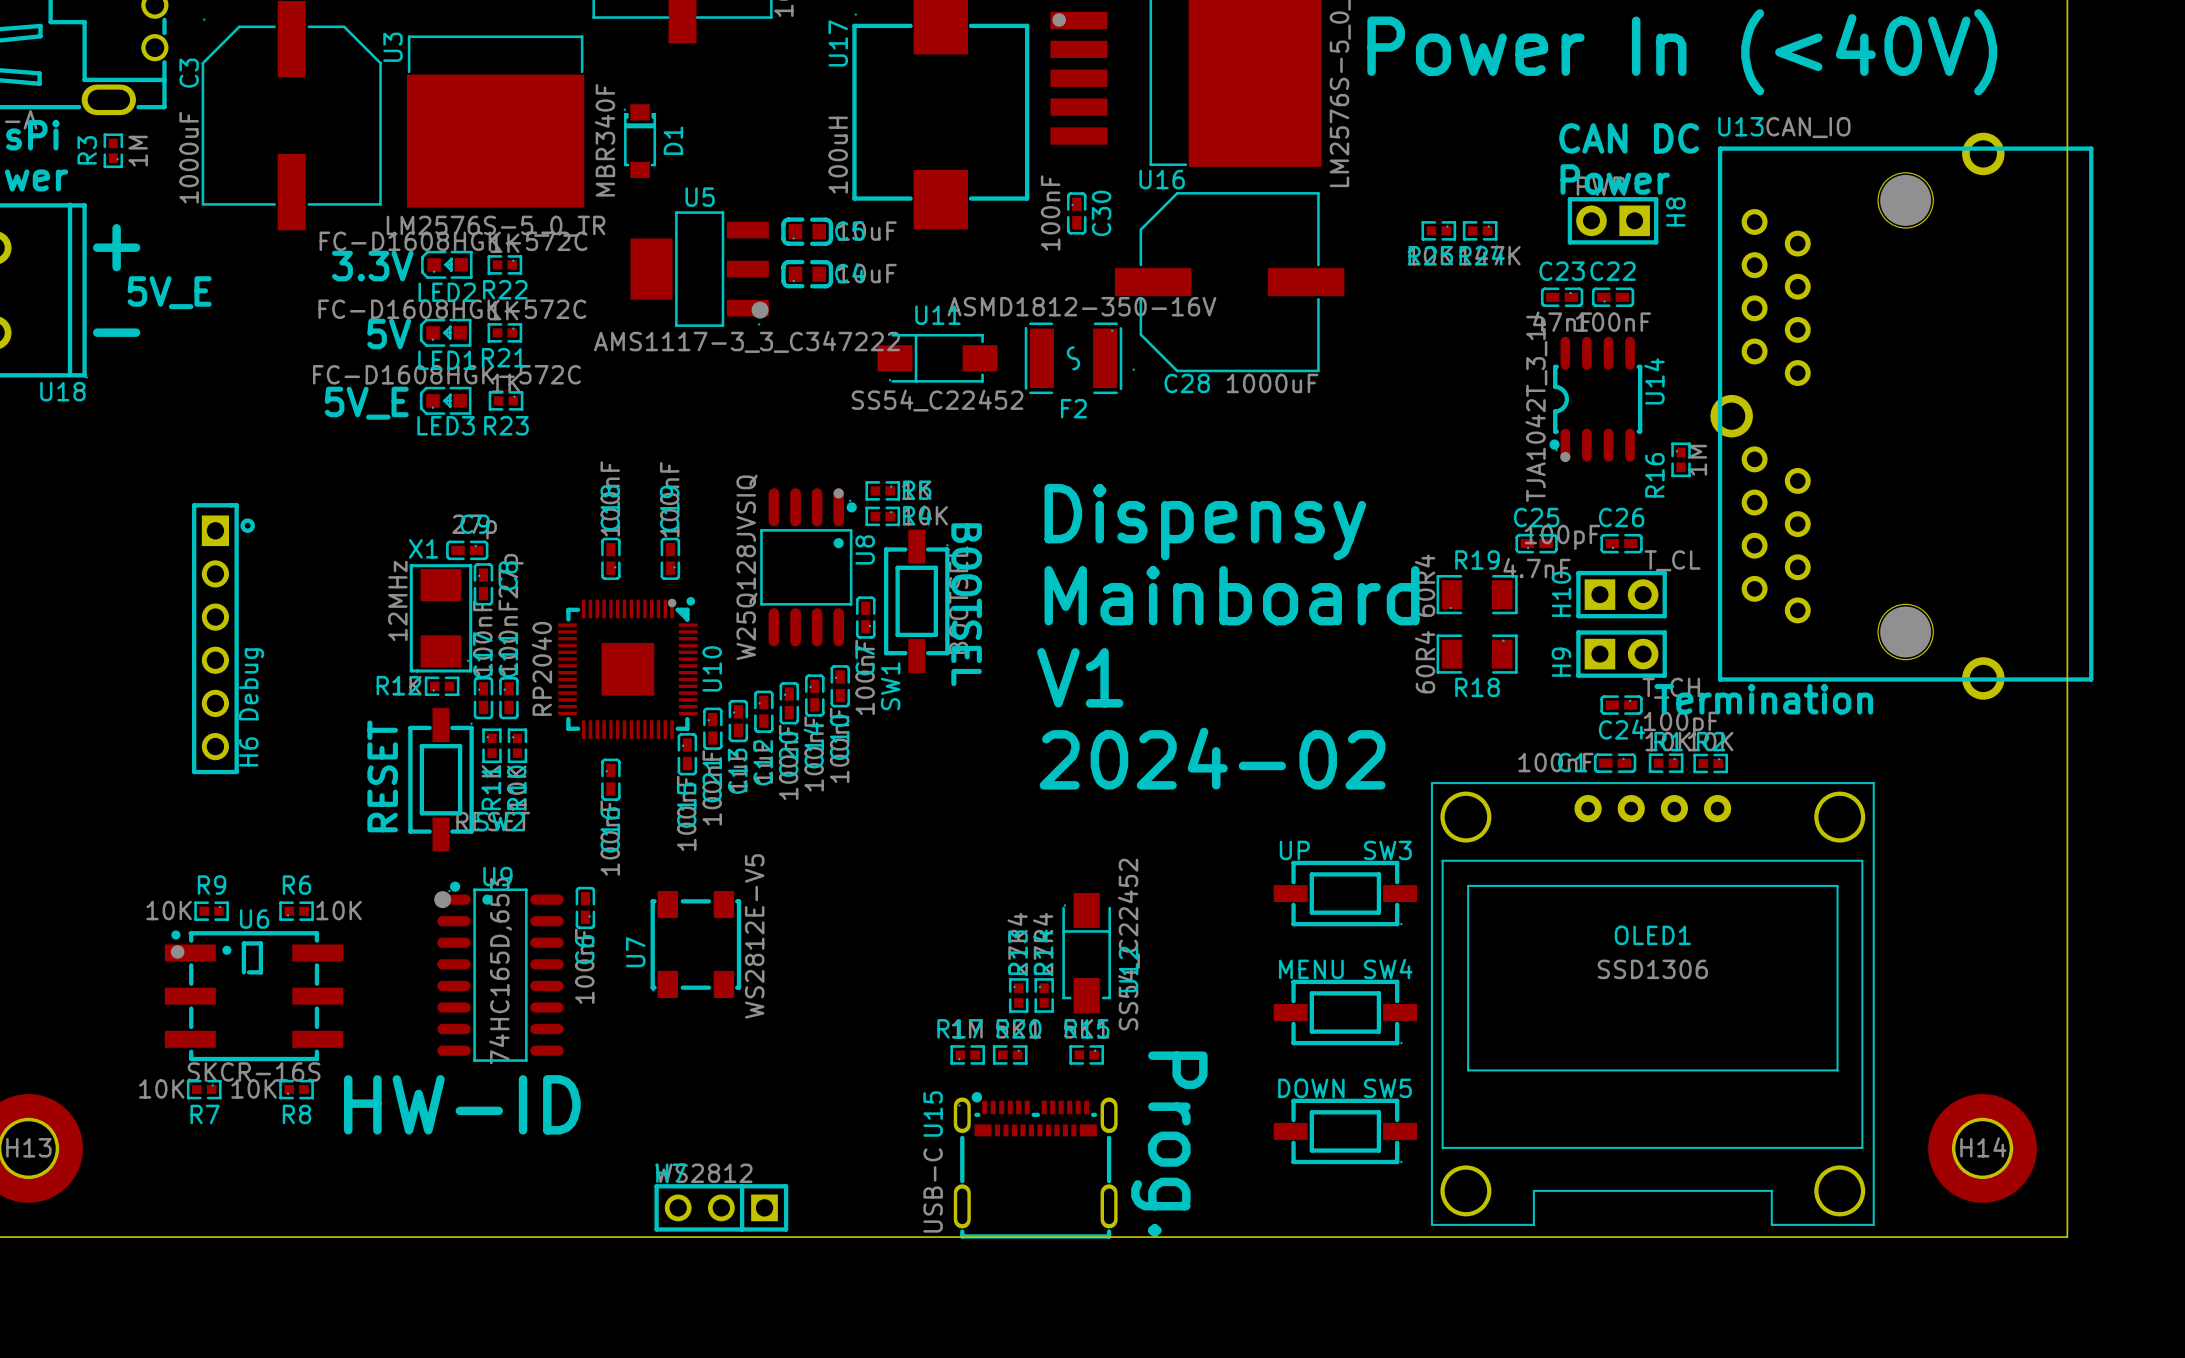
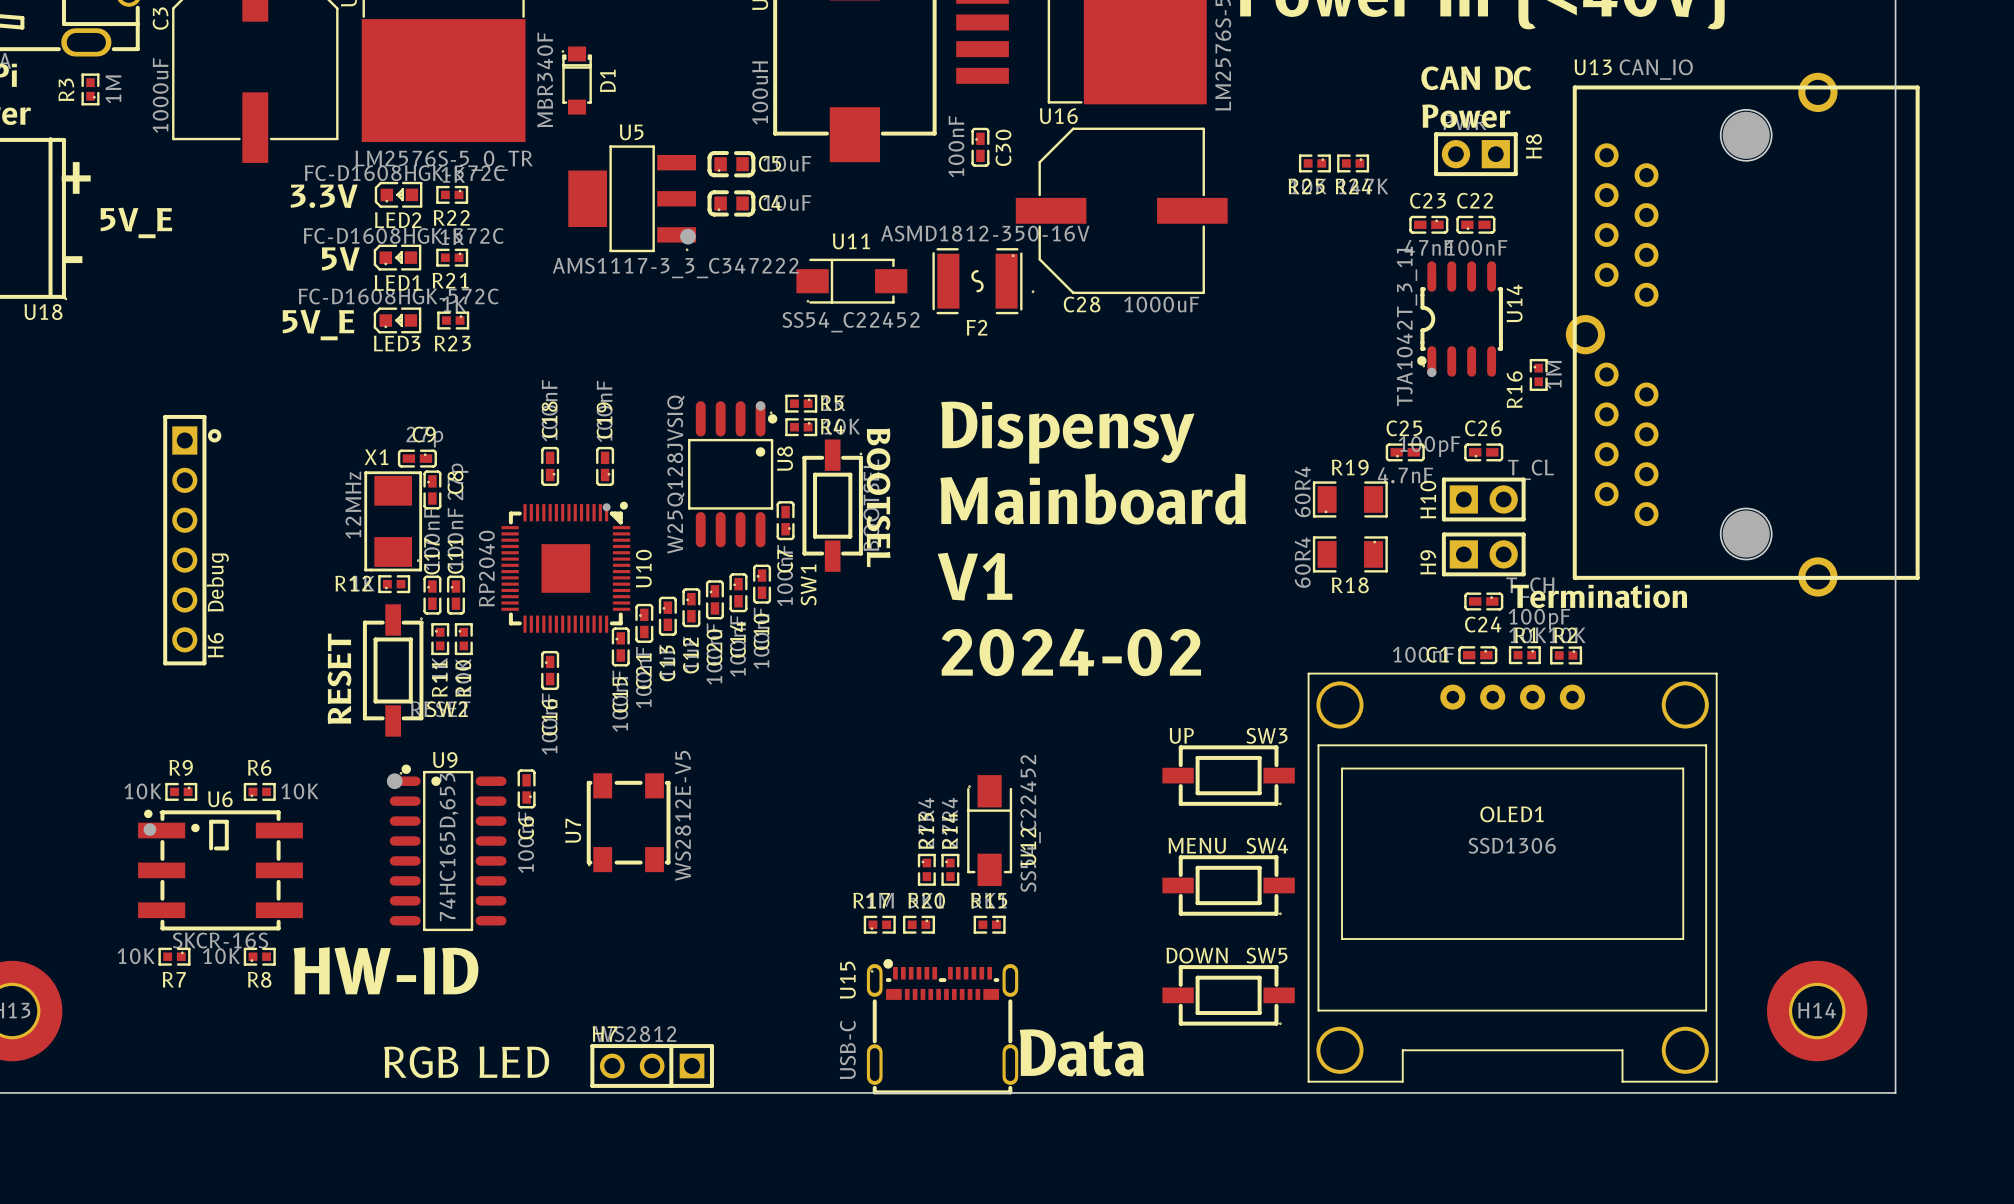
text: Prog. (1169, 1144) -> none
text: none -> Data (1081, 1052)
text: none -> RGB LED (466, 1062)

